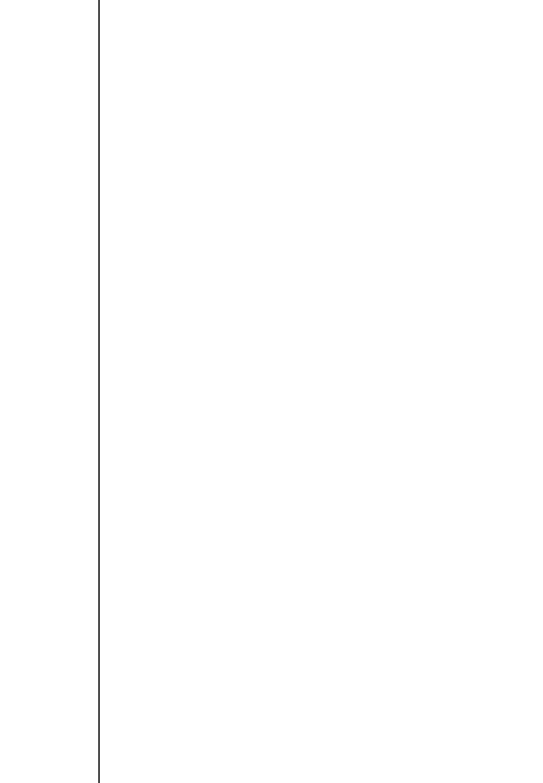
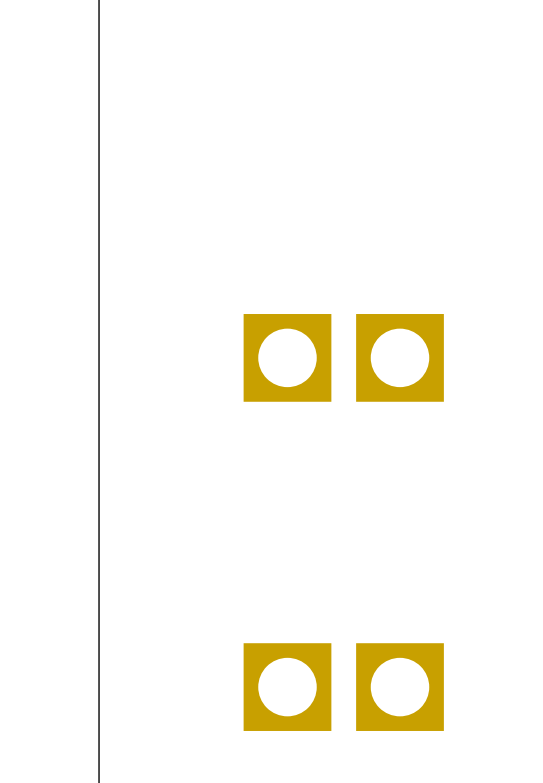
part: none -> (343, 357)
part: none -> (343, 687)

